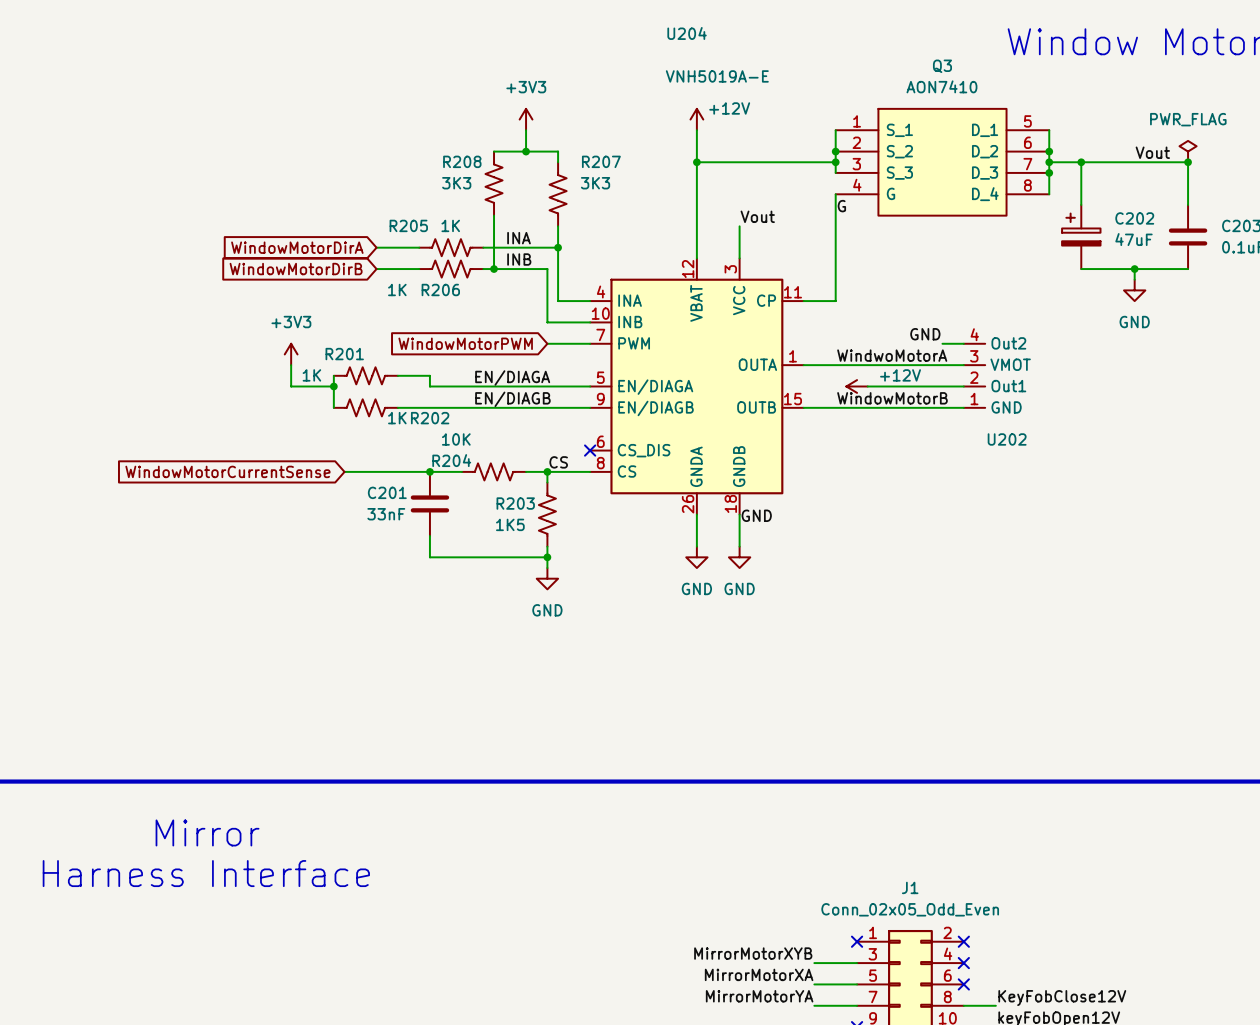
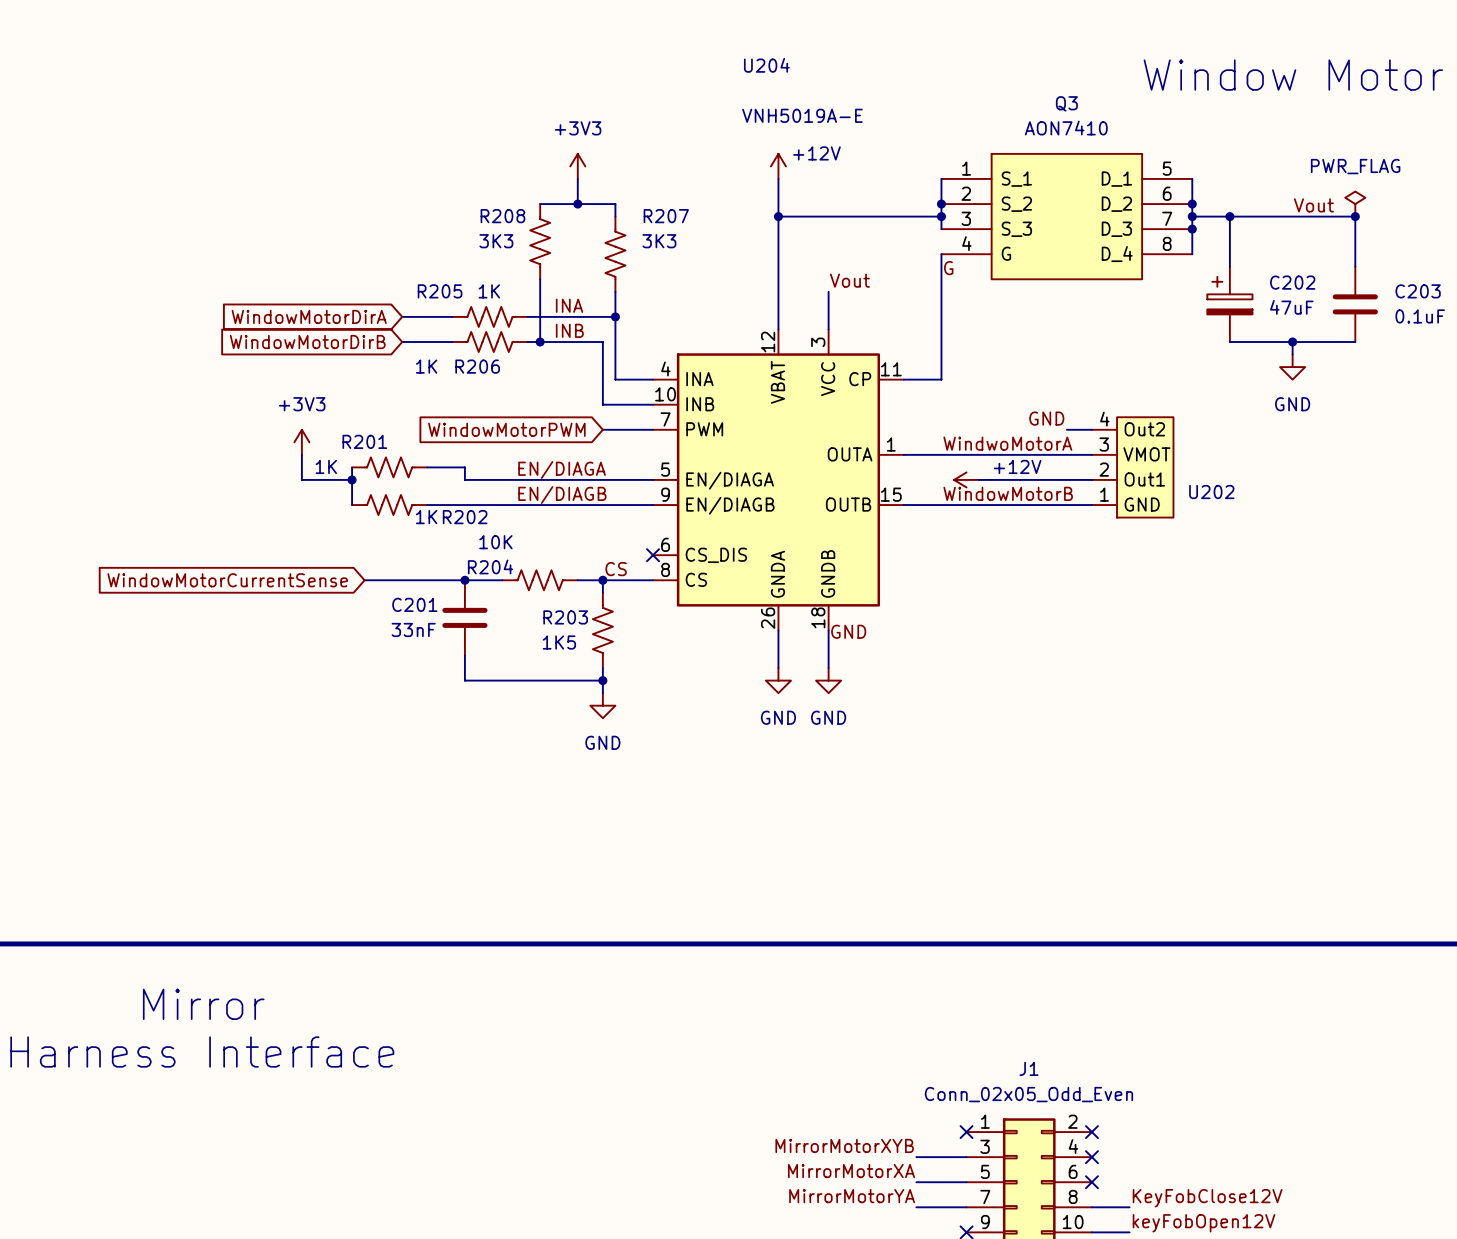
U202 symbol: [963, 343, 986, 408] -> [1091, 417, 1174, 518]
U202 name position: U202 (1007, 439) -> U202 (1211, 492)

